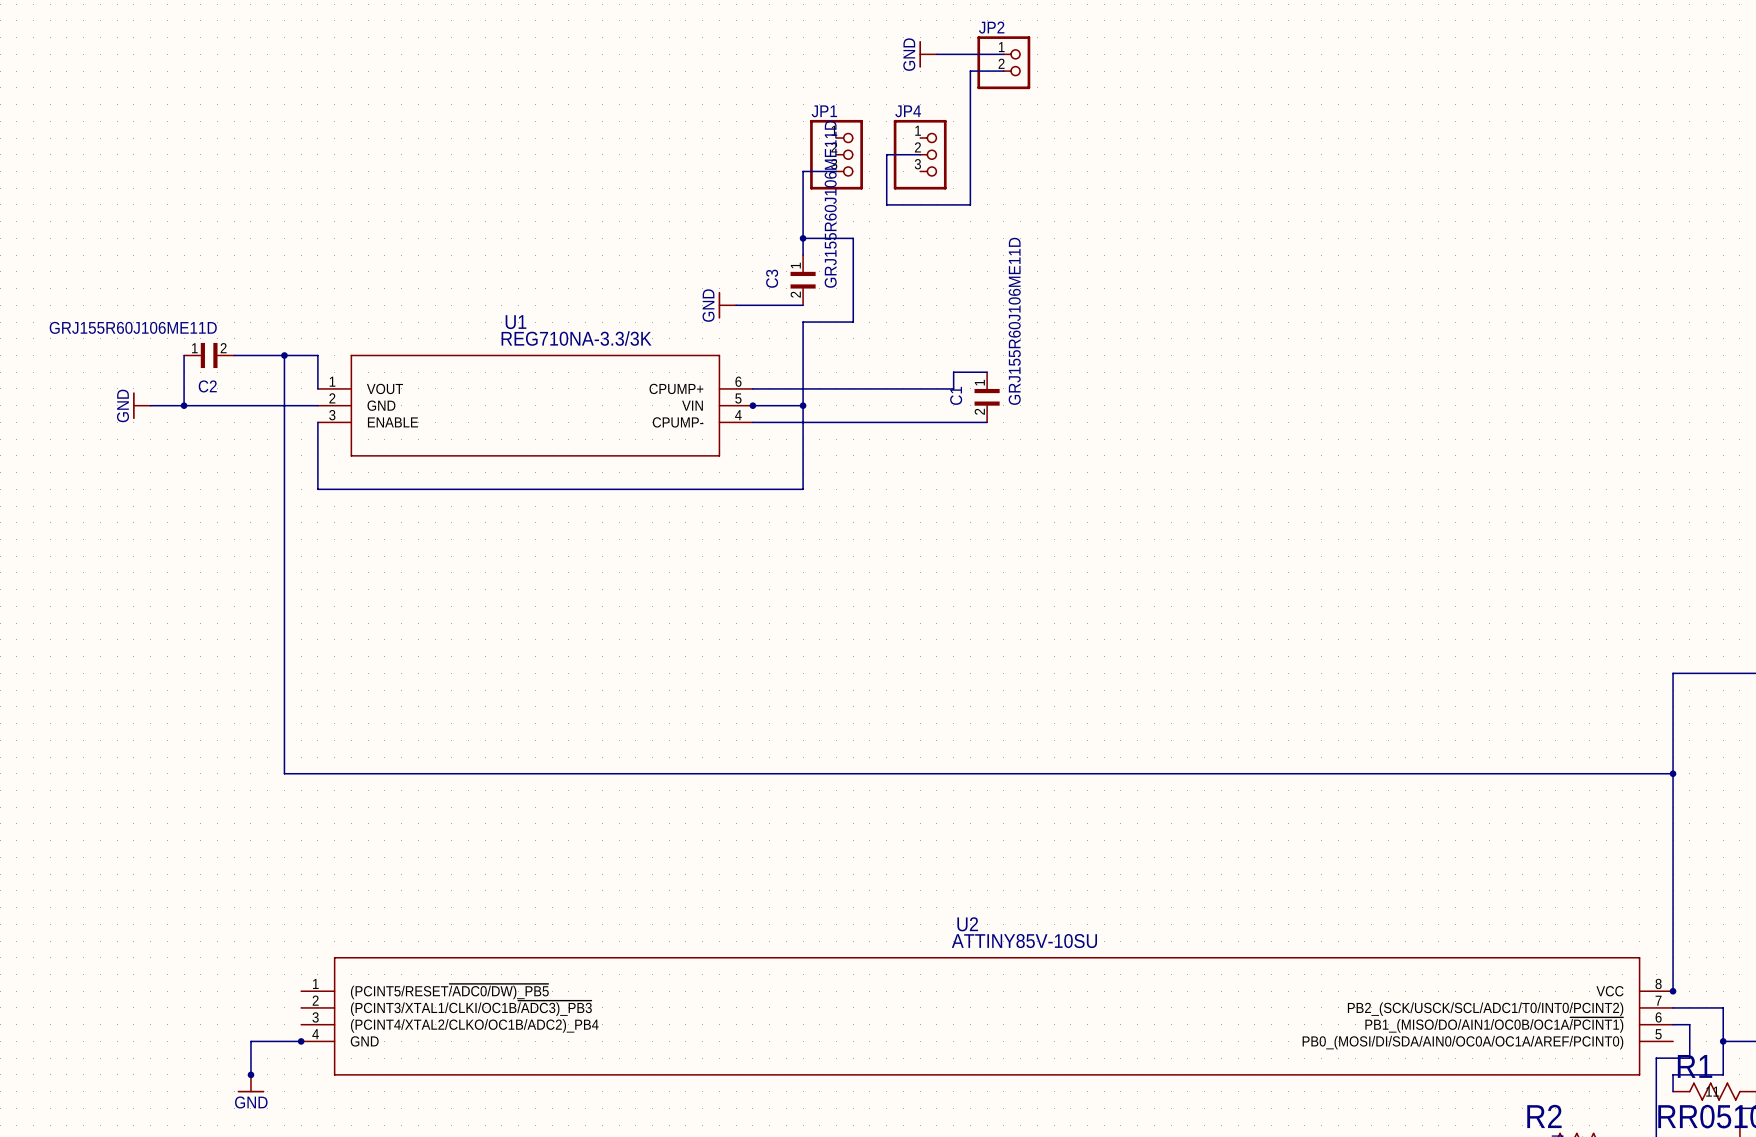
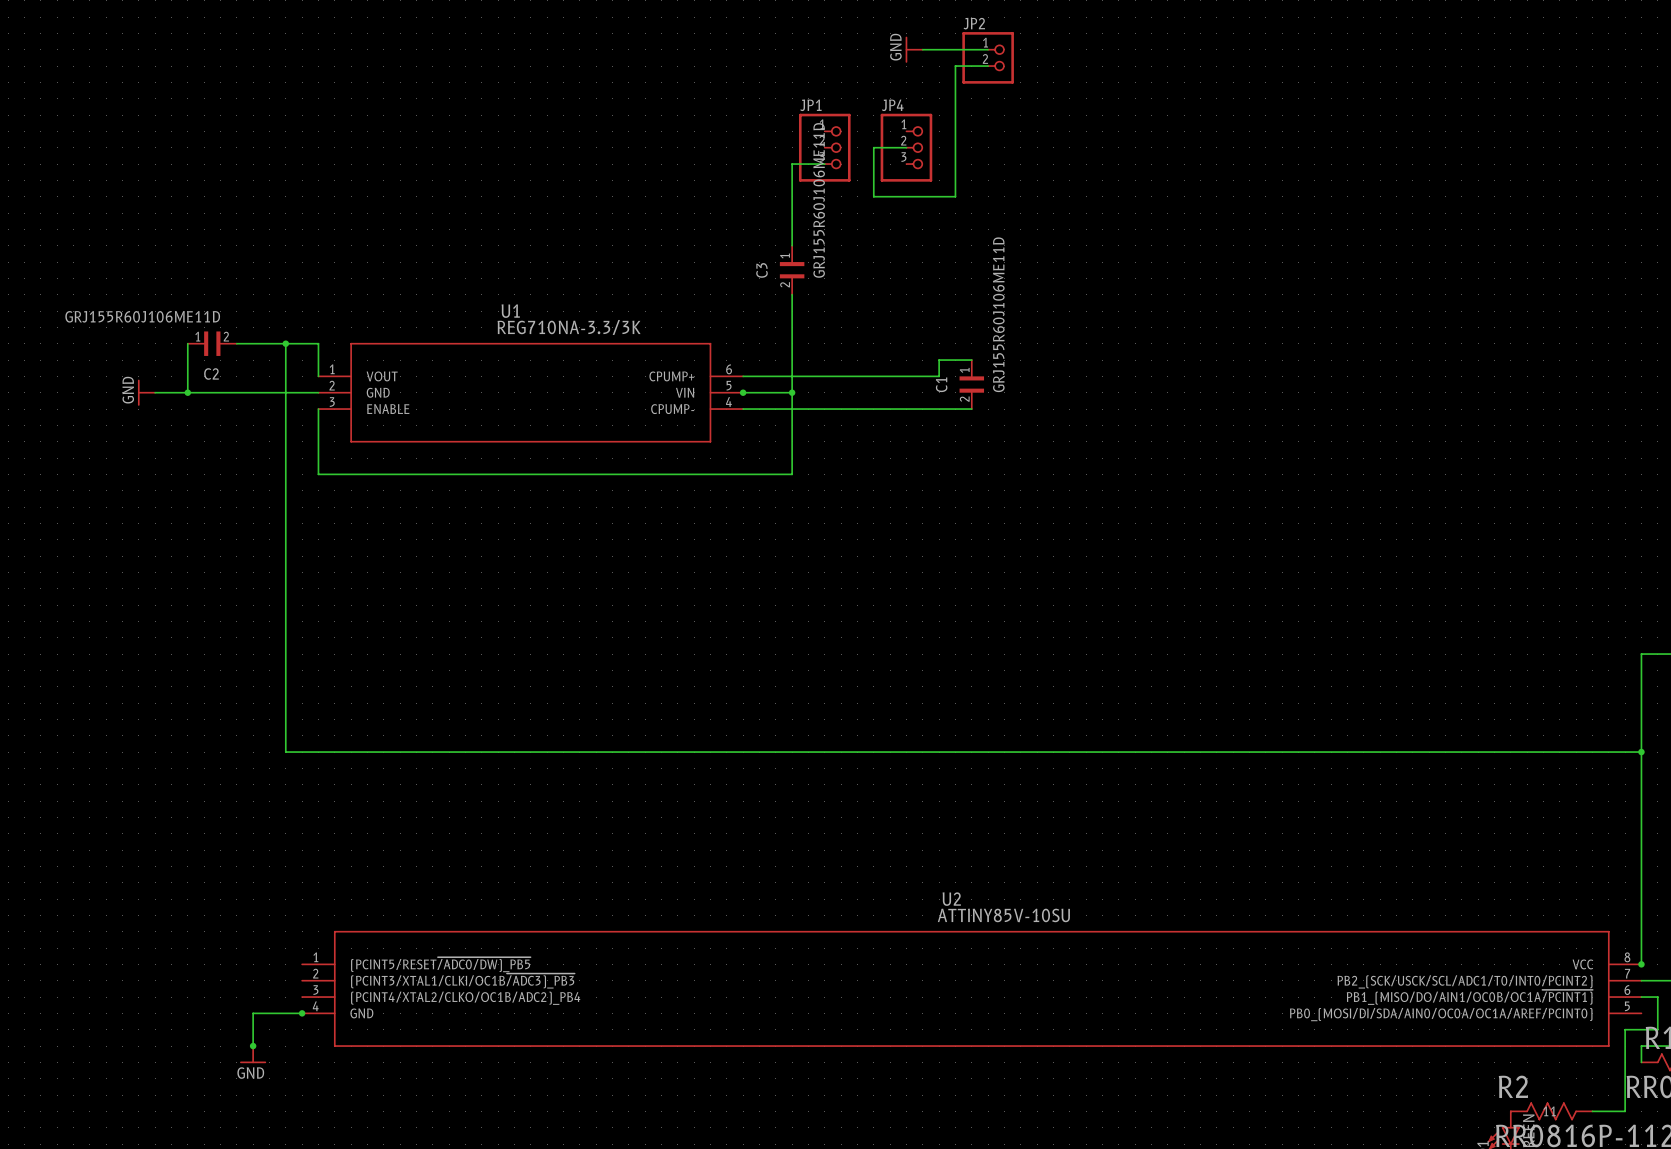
wire: (803, 238) (853, 238) (853, 322) (803, 322) -> (792, 294) (792, 311)
junction: (803, 238) -> none
power symbol: GND (727, 305) -> none
wire: (736, 305) (803, 305) -> none

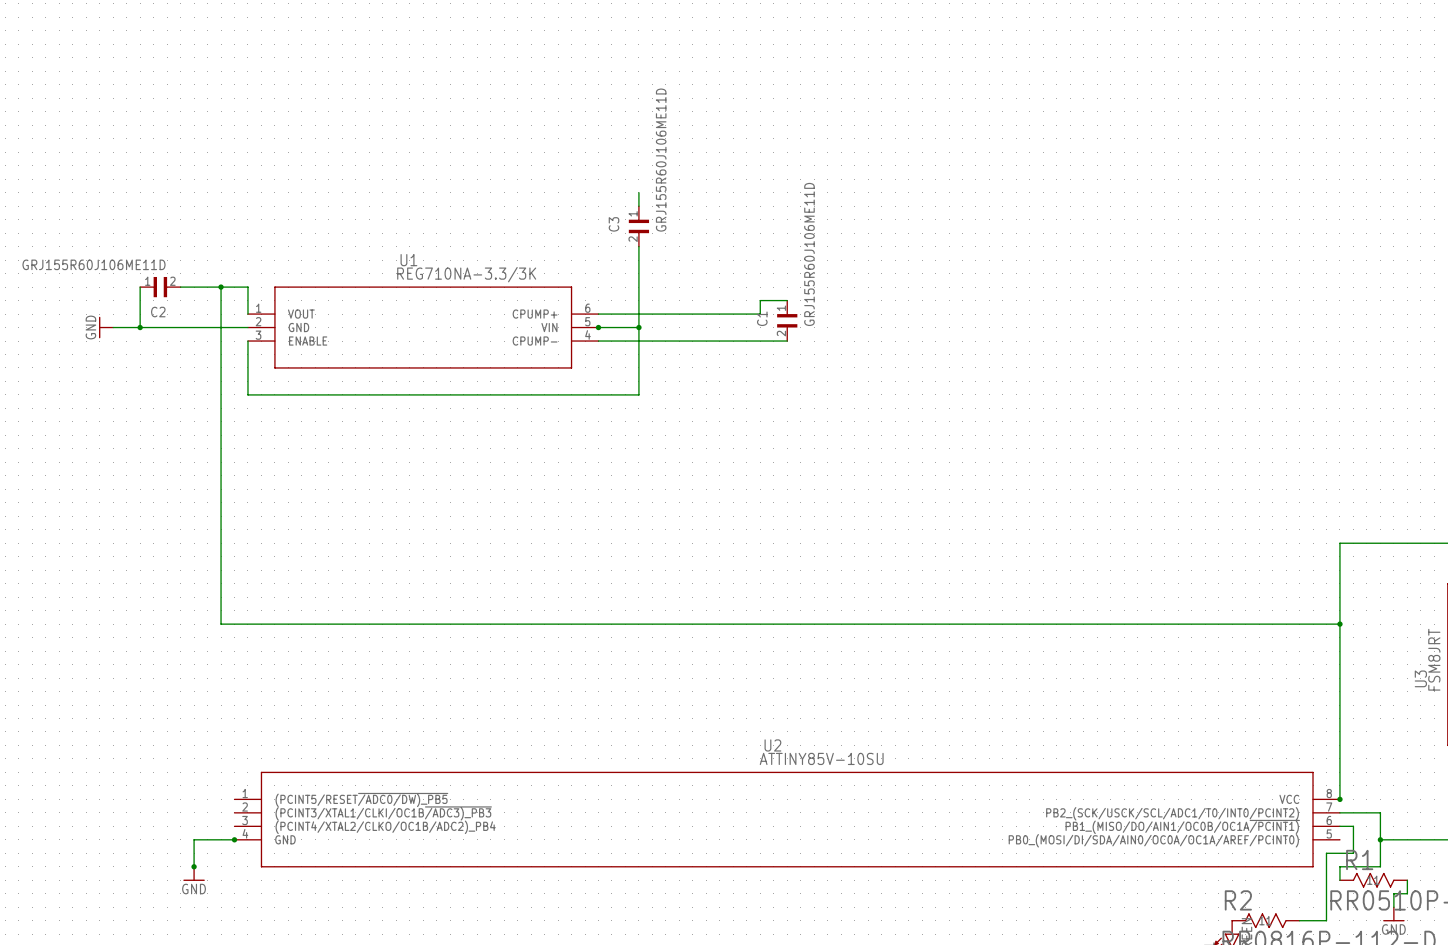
power symbol: GND (914, 49) -> none
wire: (922, 49) (988, 49) -> none
JP2: (988, 57) -> none
wire: (988, 66) (955, 66) (955, 196) (873, 196) (873, 147) (906, 147) -> none
JP1: (824, 147) -> none
JP4: (906, 147) -> none
wire: (824, 164) (792, 164) (792, 229) -> none

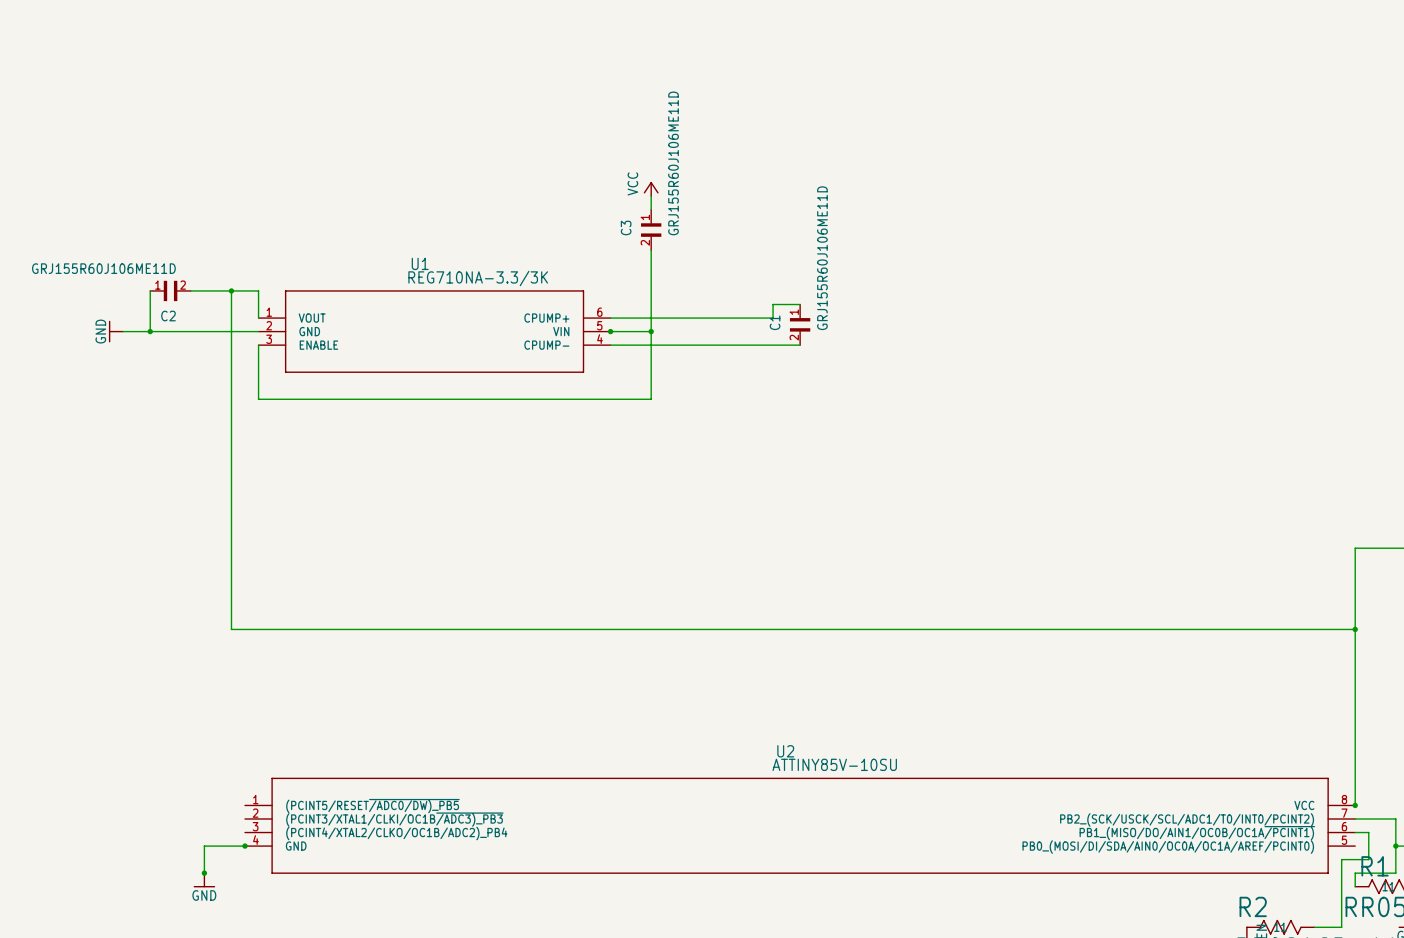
power symbol: none -> VCC (651, 189)

